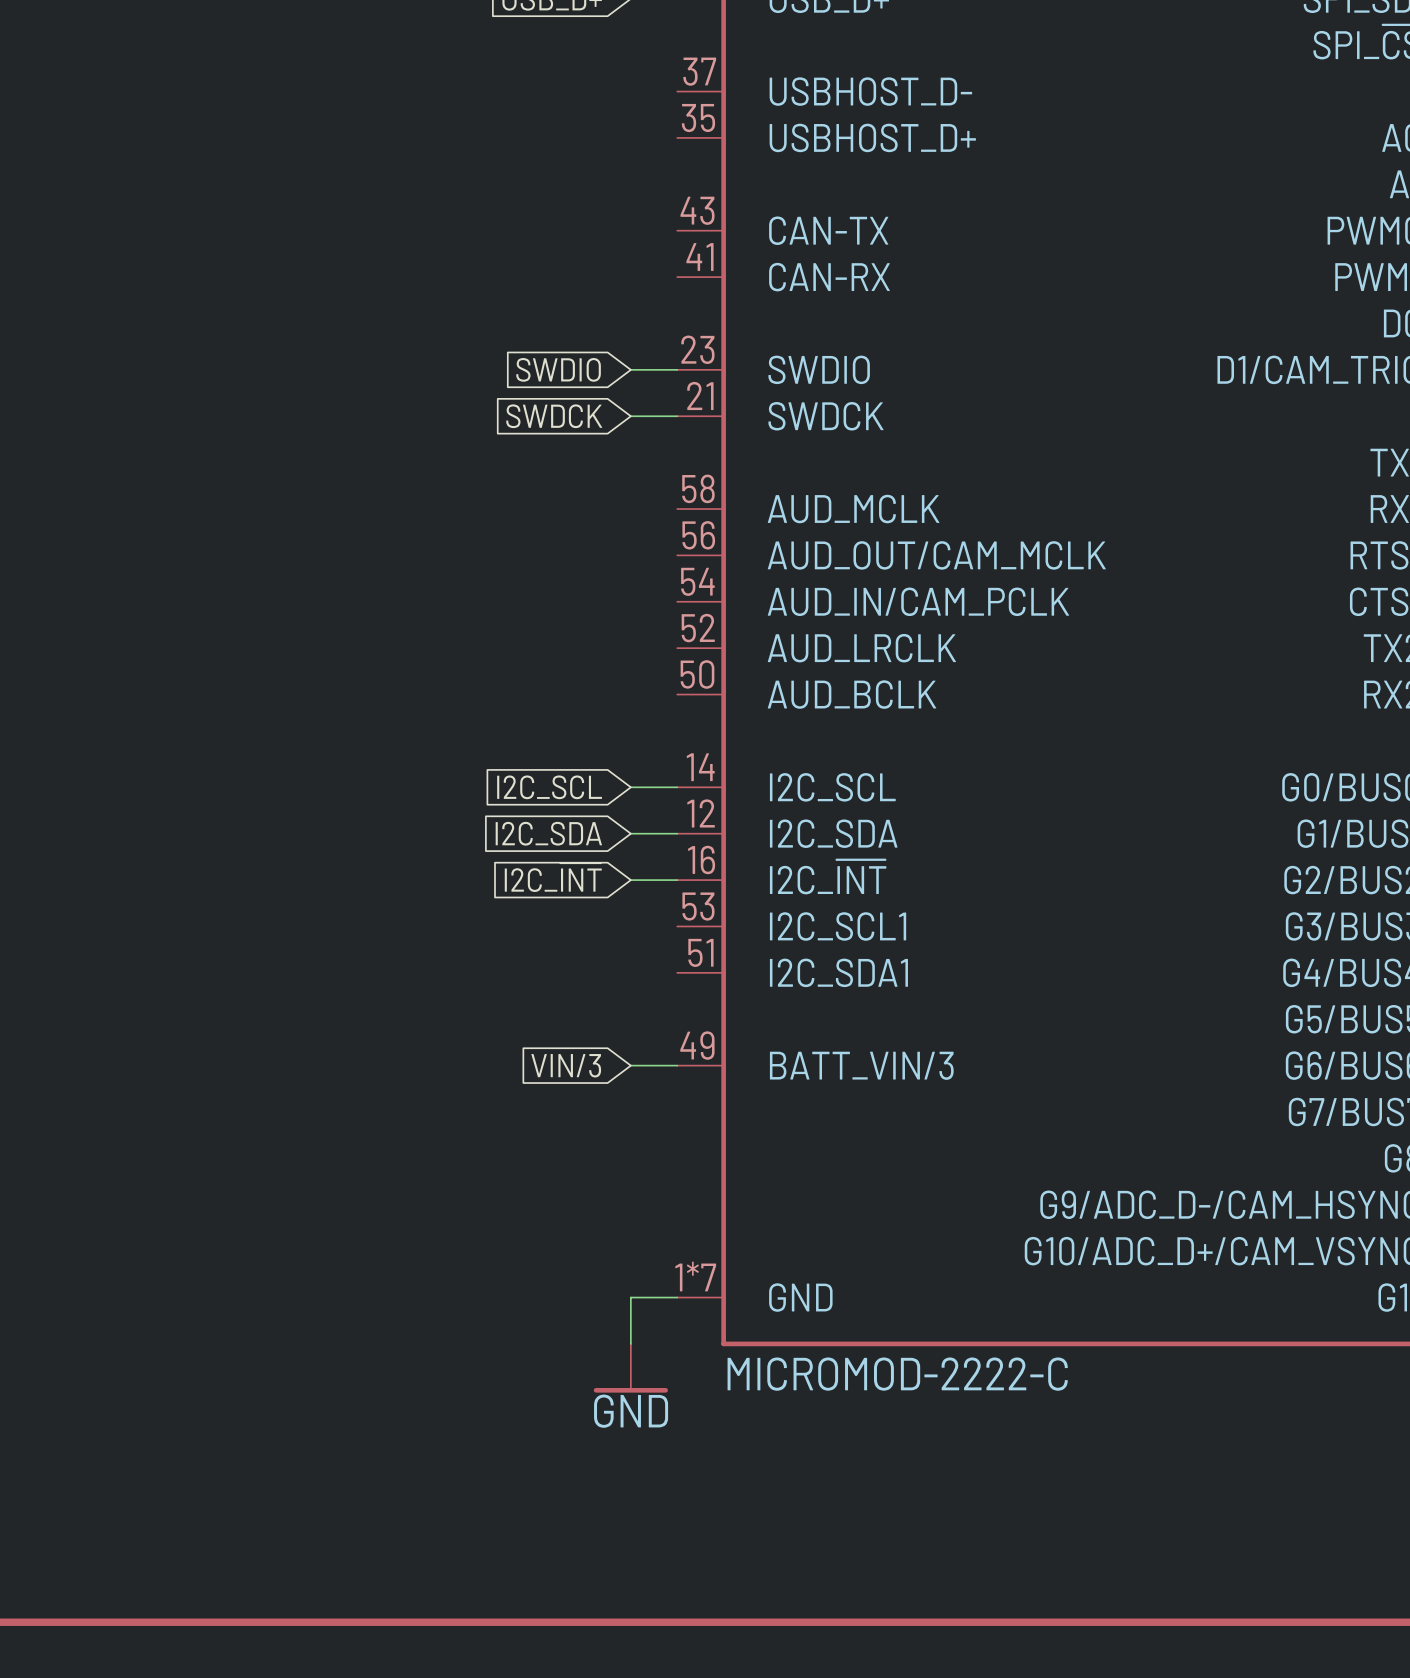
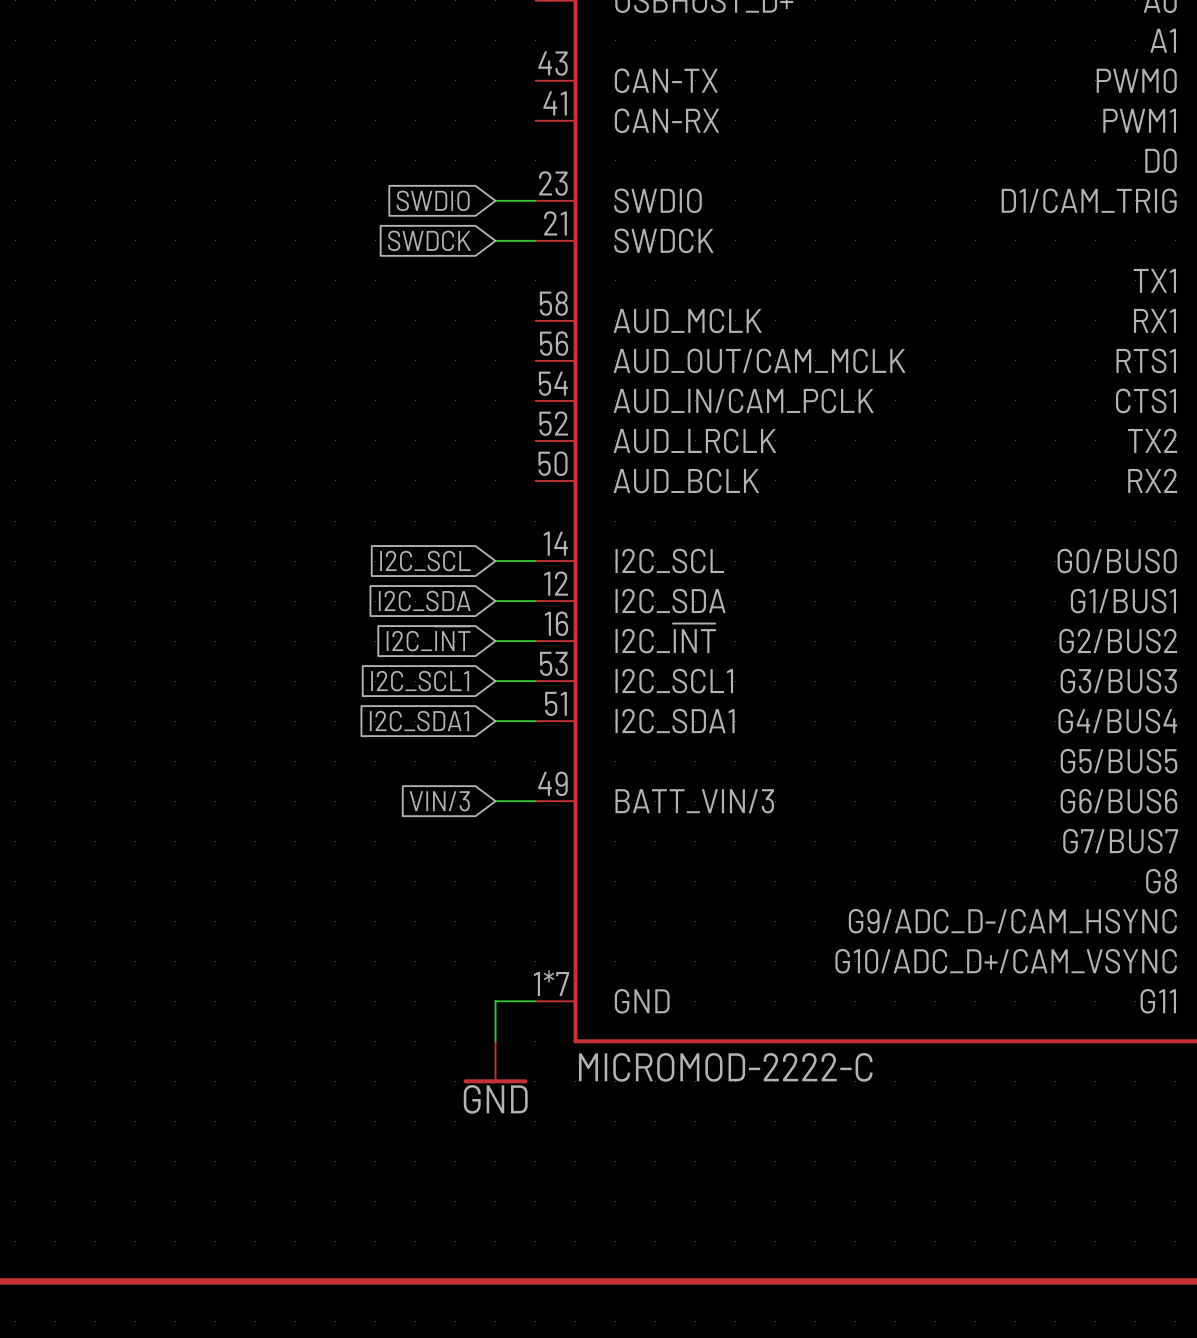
global label: none -> I2C_SCL1 (420, 681)
wire: none -> (495, 681) (535, 681)
global label: none -> I2C_SDA1 (419, 721)
wire: none -> (495, 721) (535, 721)

